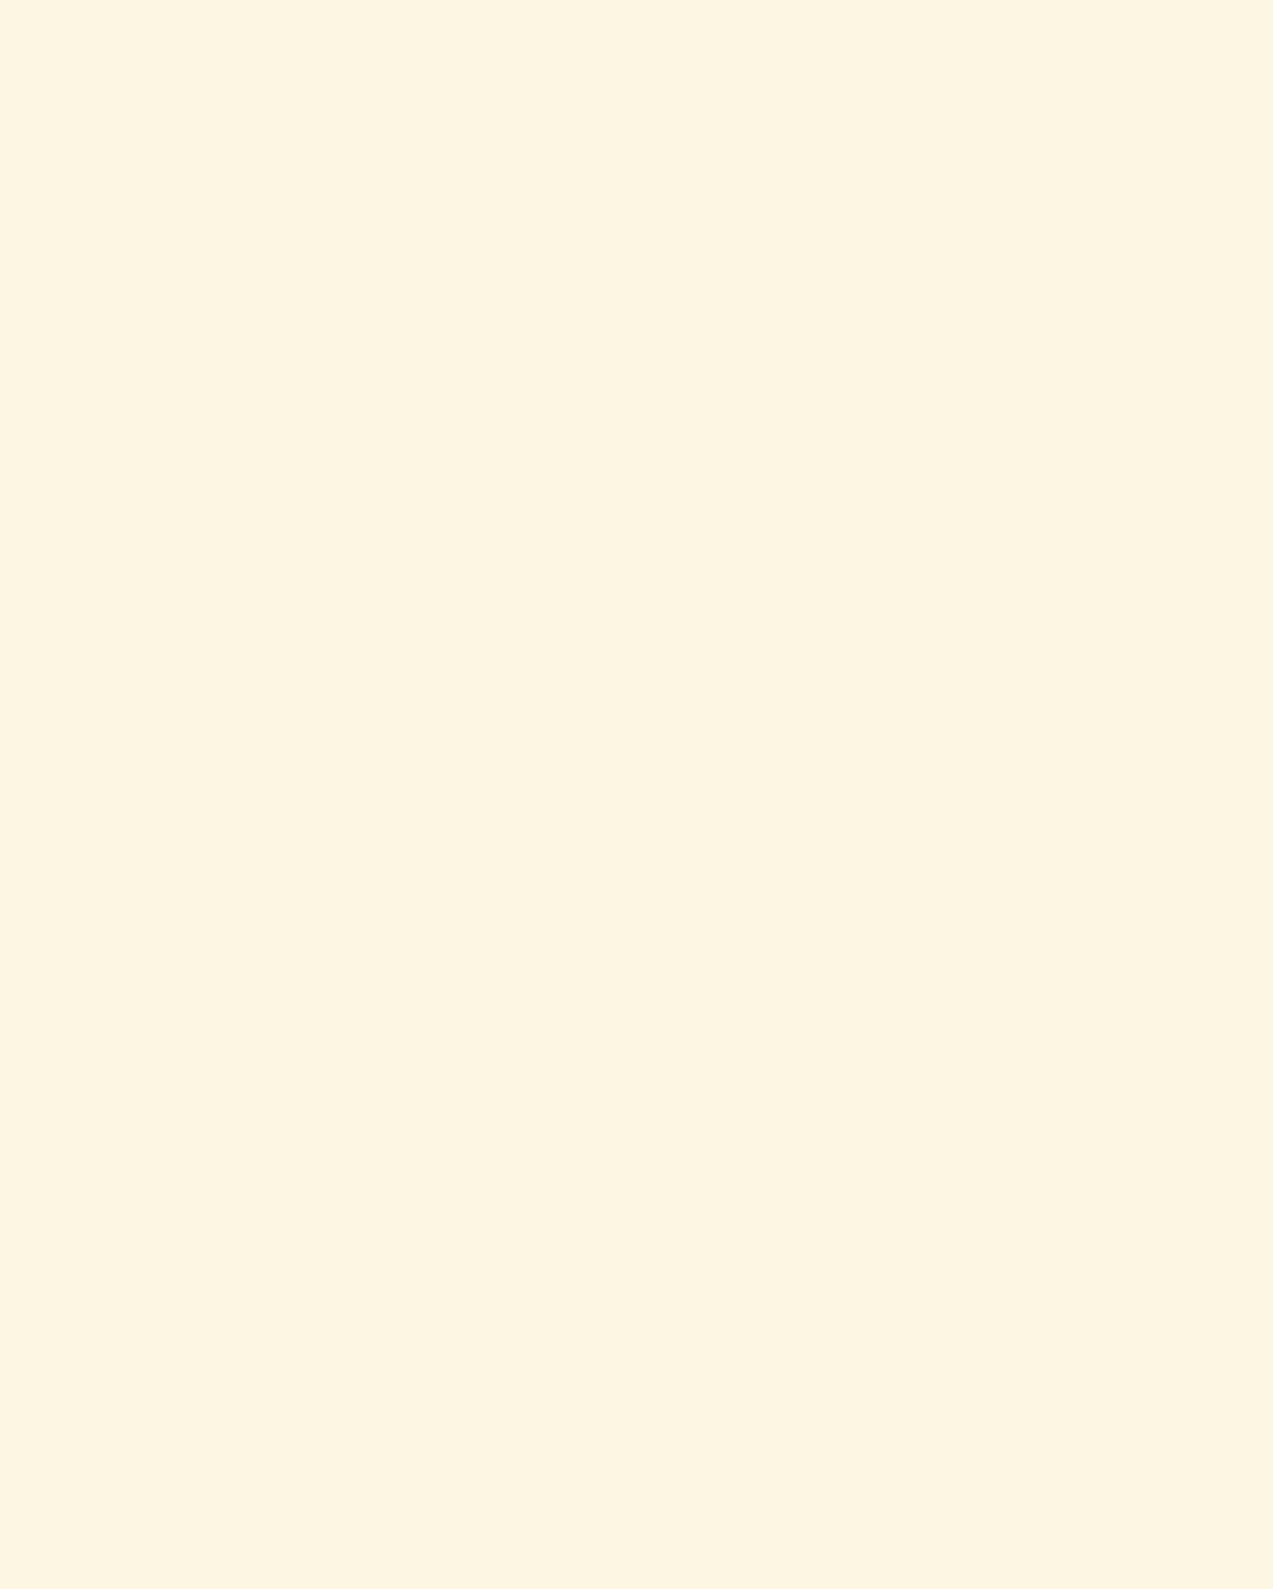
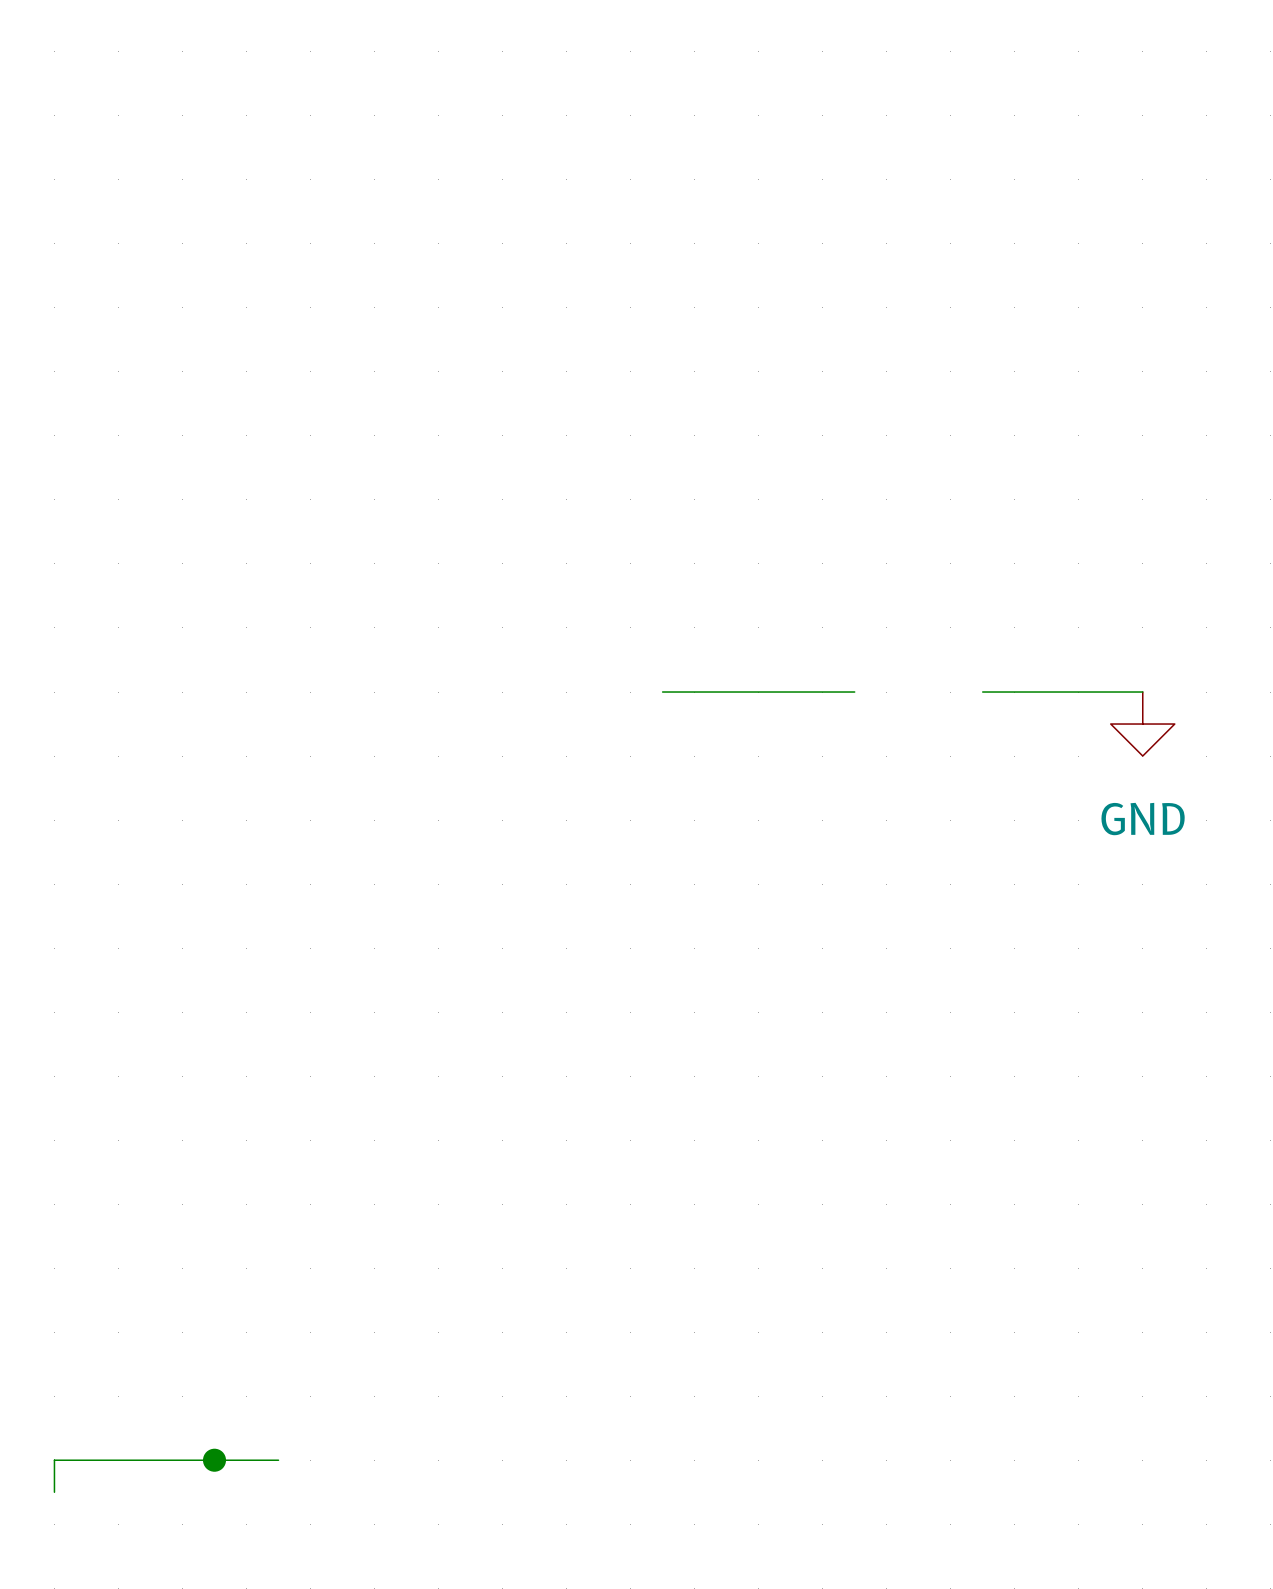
wire: none -> (662, 692) (854, 692)
wire: none -> (982, 692) (1142, 692)
power symbol: none -> GND (1142, 724)
junction: none -> (214, 1460)
wire: none -> (278, 1460) (54, 1460) (54, 1492)

